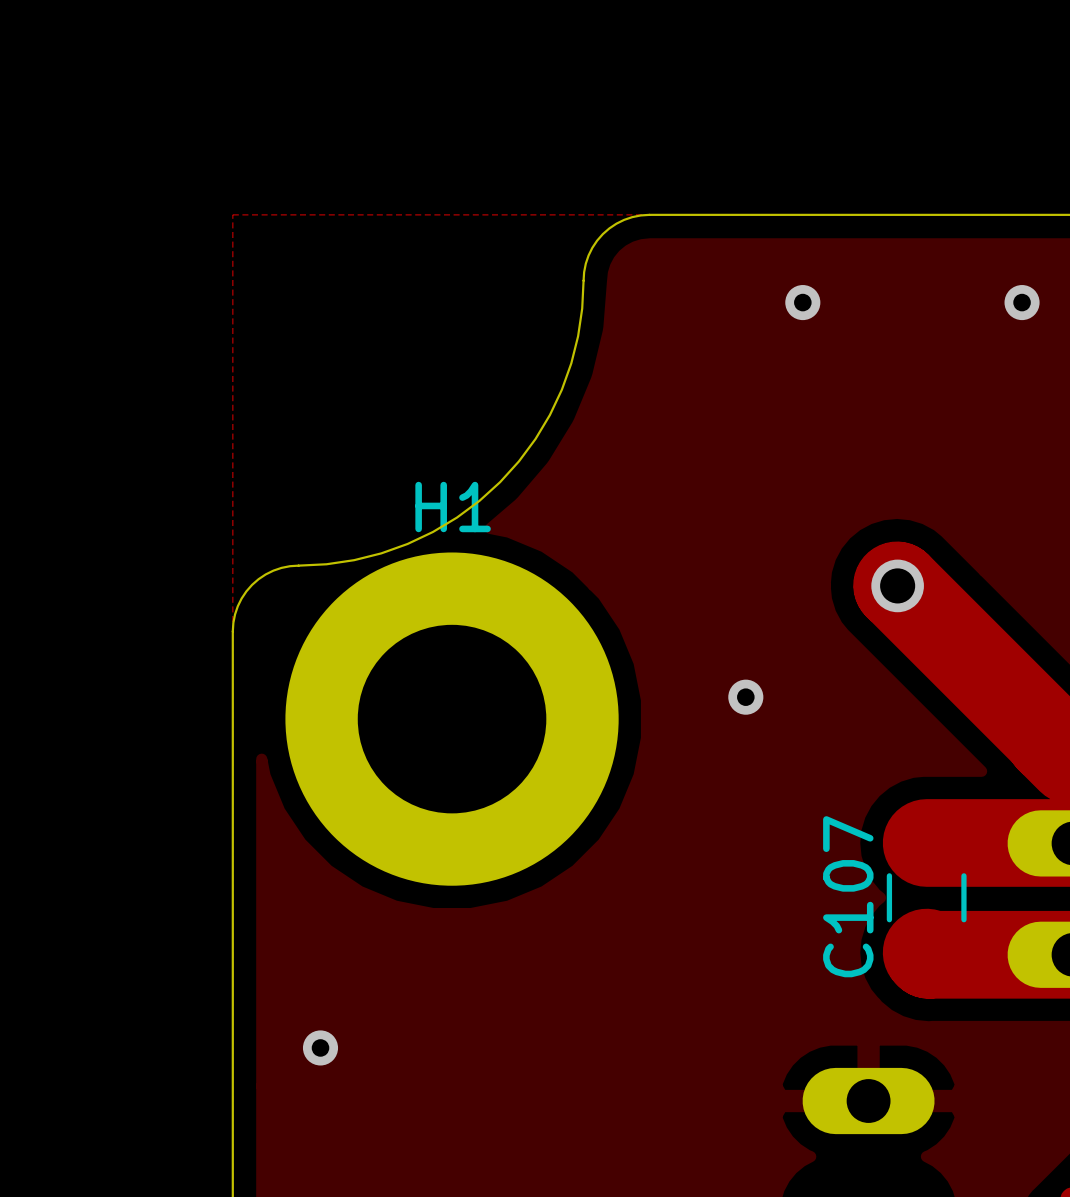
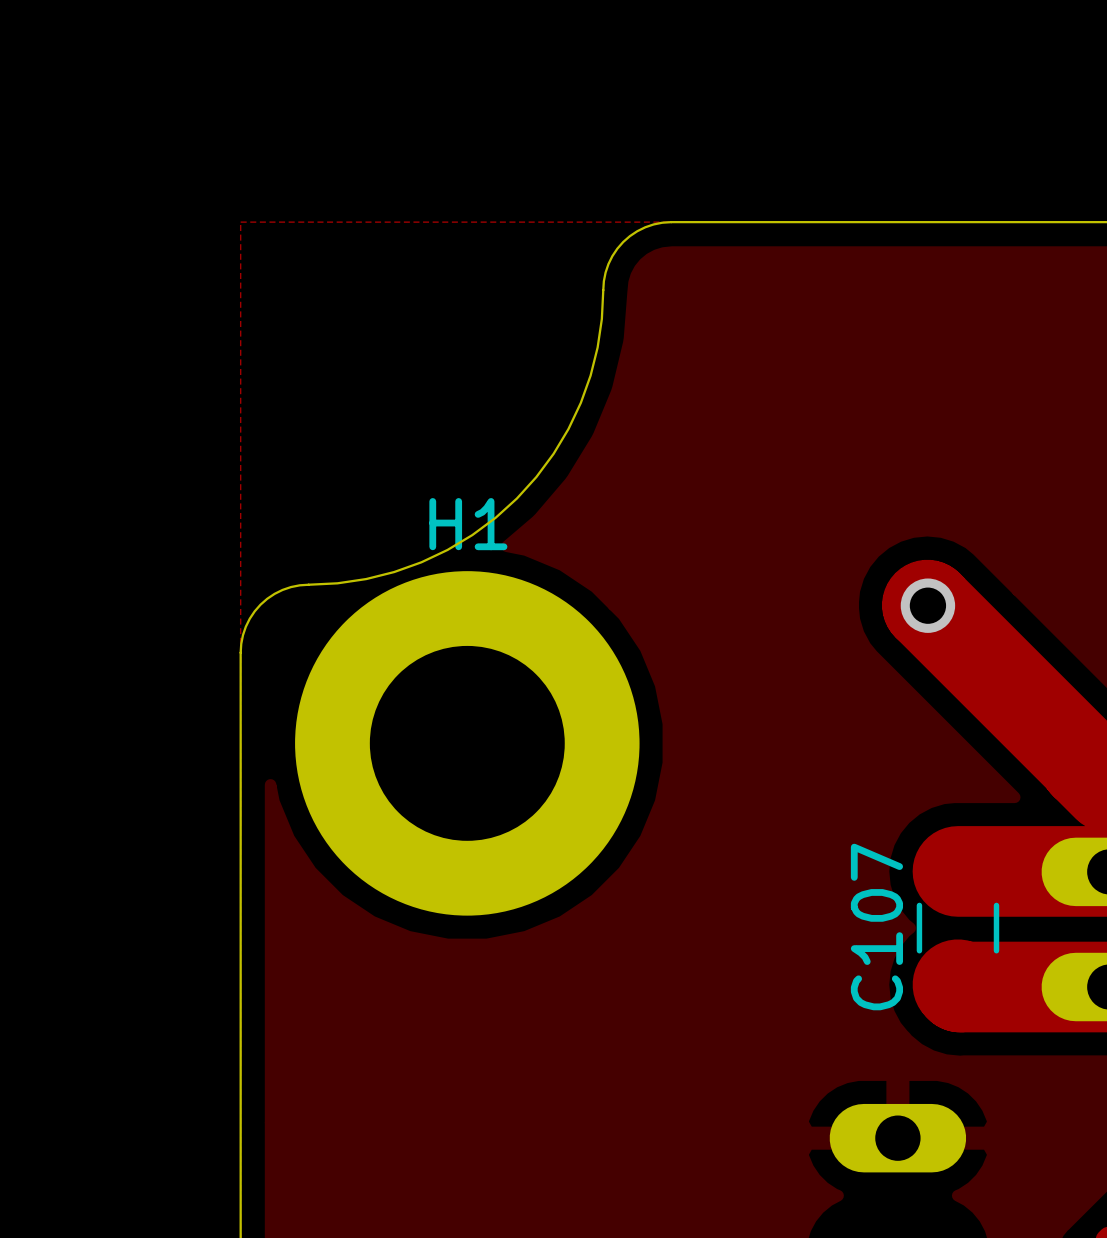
via: (802, 302) -> none
via: (1022, 302) -> none
via: (745, 697) -> none
via: (320, 1047) -> none

